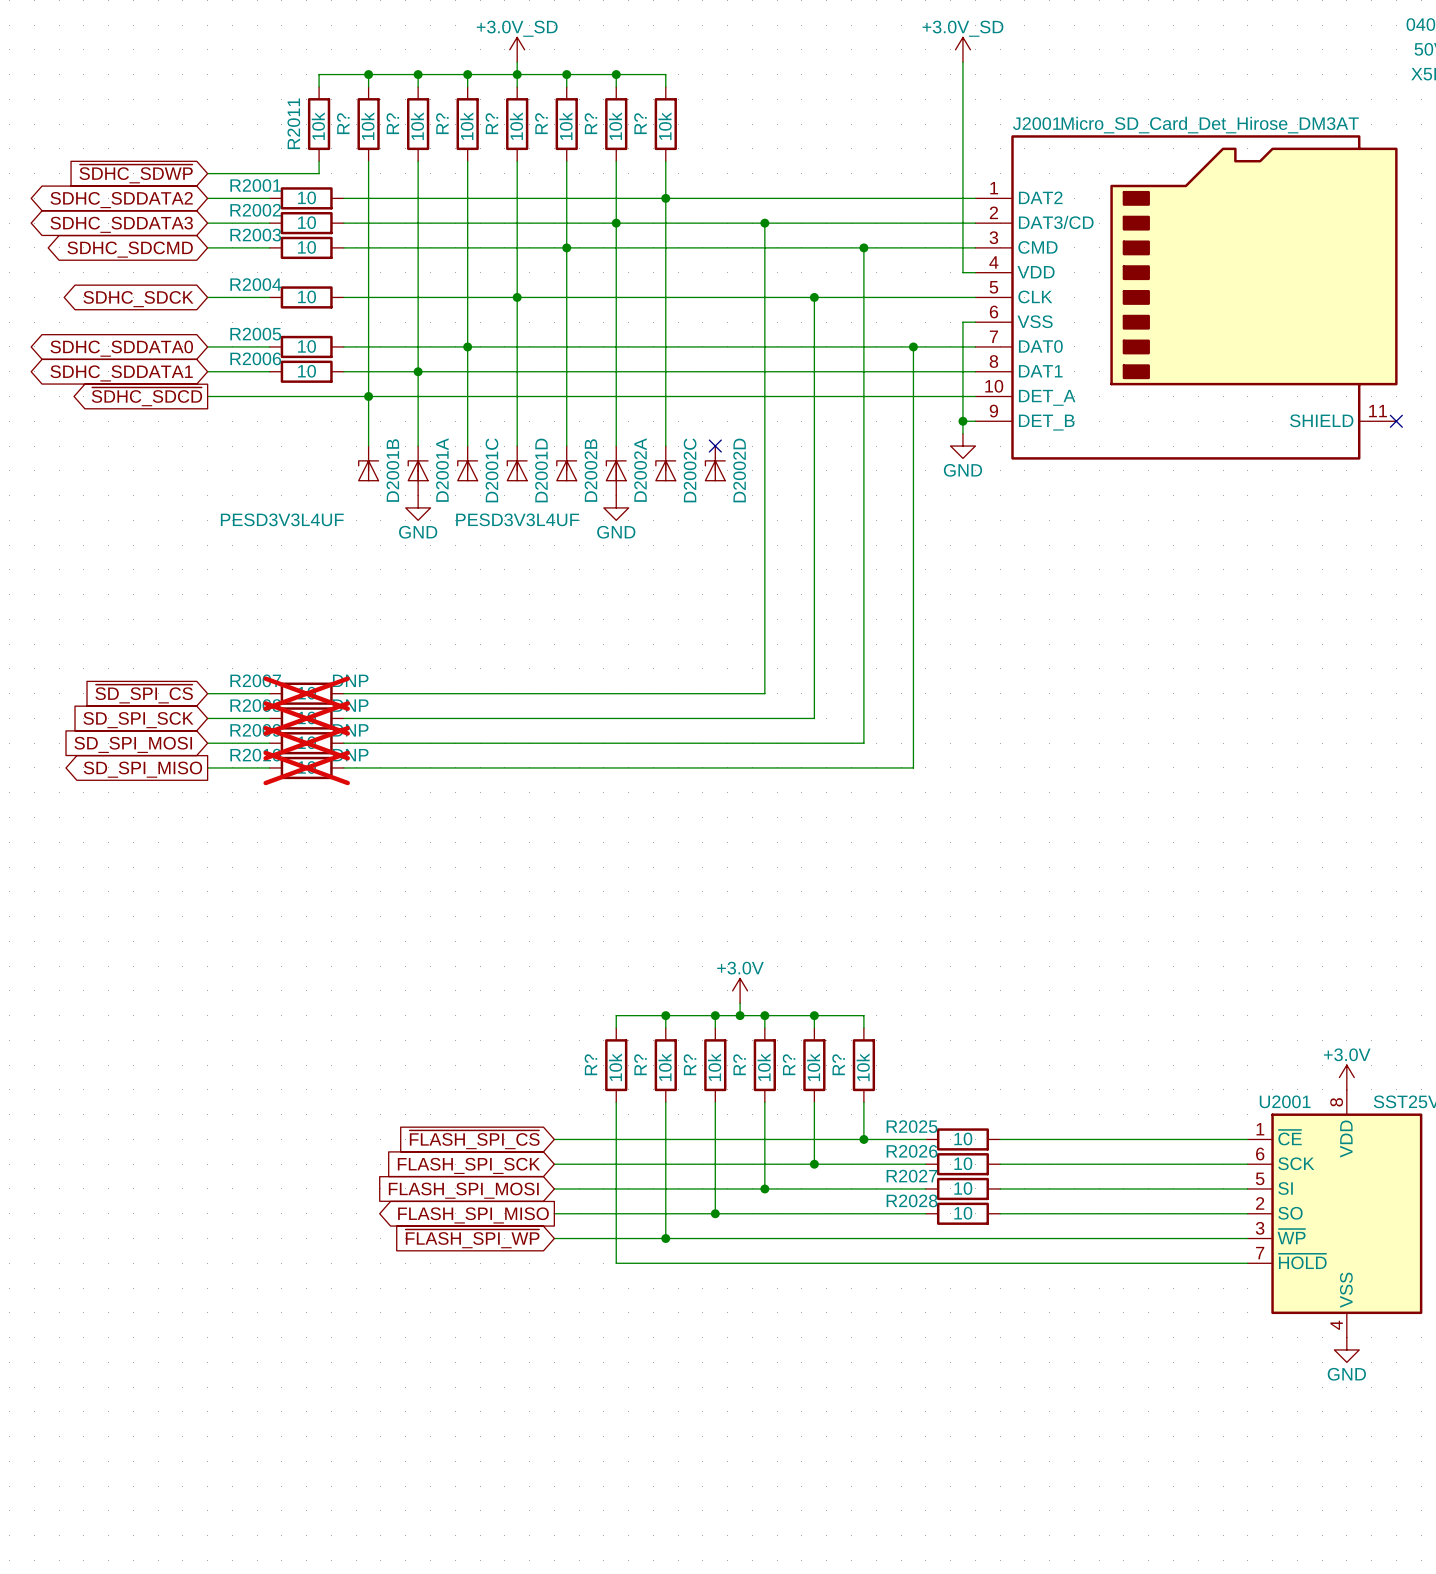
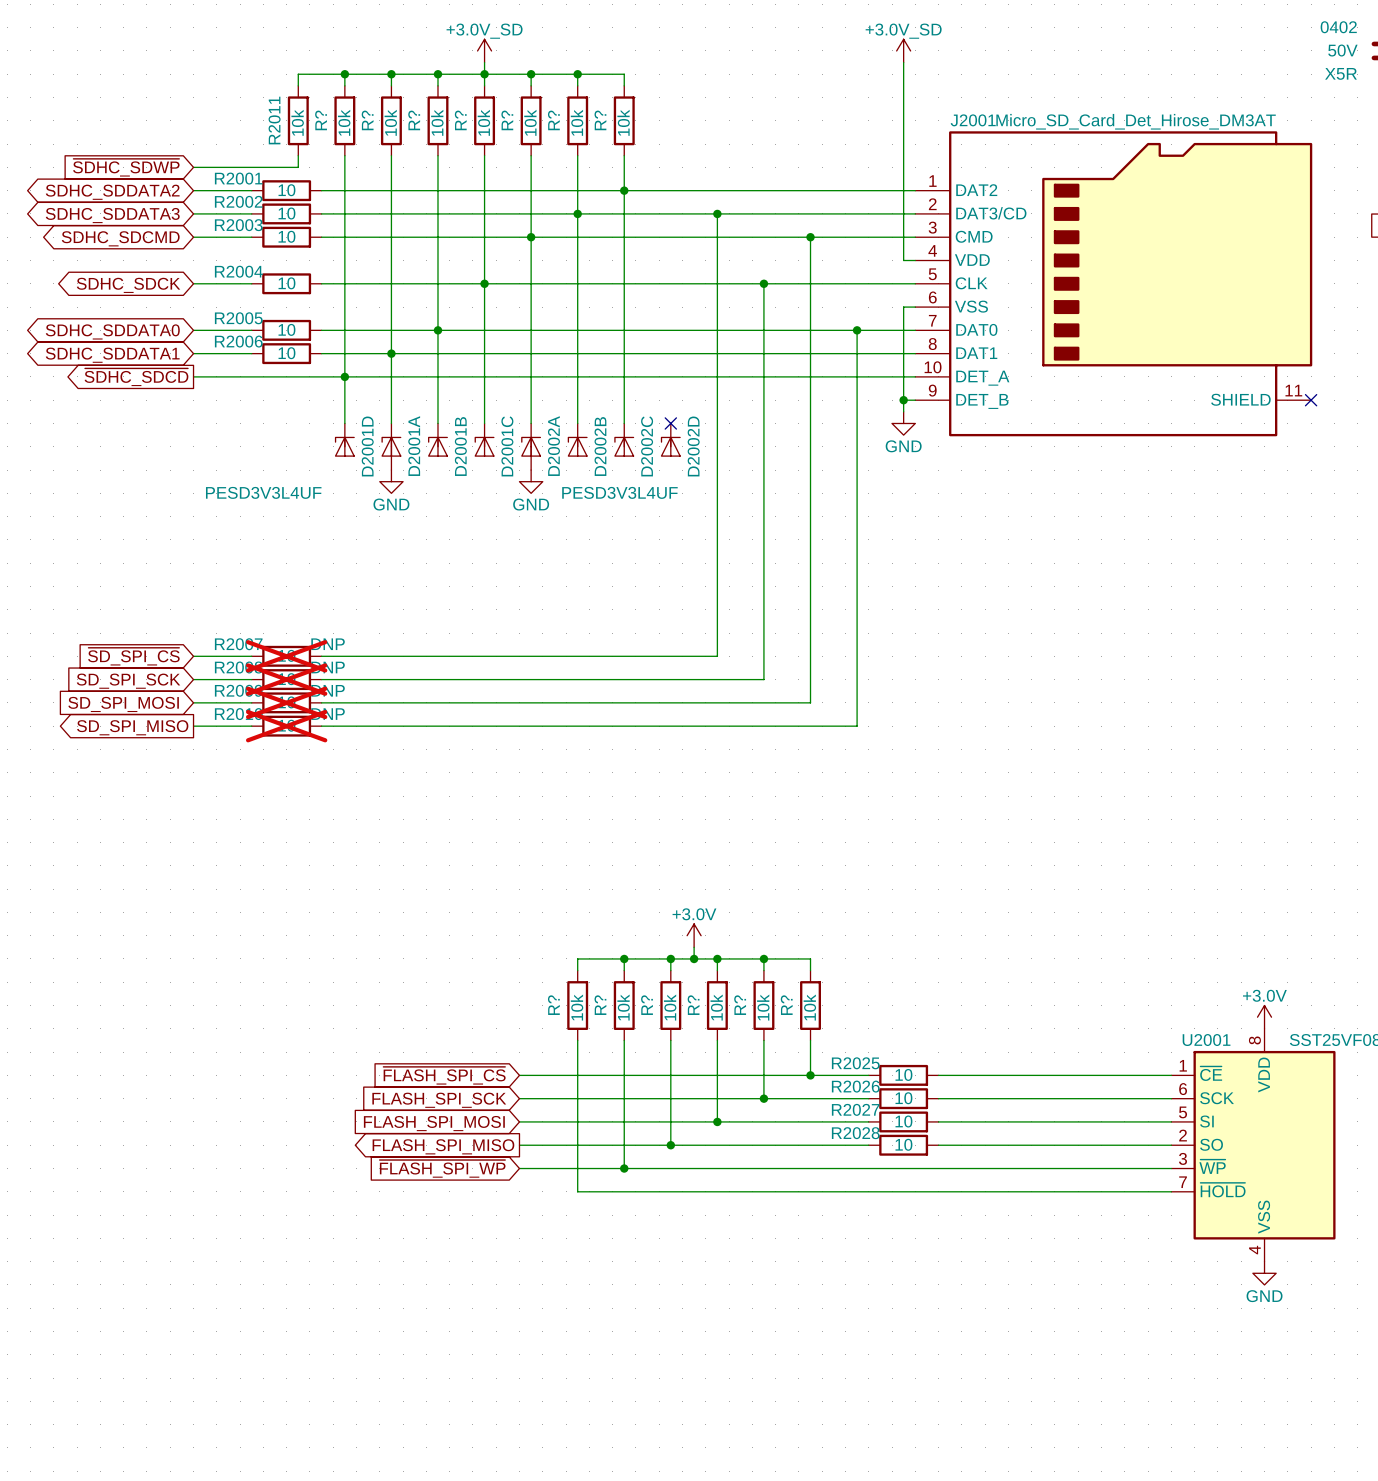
D2002B position: (566, 463) -> (577, 439)
D2001B name: D2001B (392, 470) -> D2001D (367, 446)
D2001C name: D2001C (491, 470) -> D2001B (460, 446)
D2001D name: D2001D (541, 470) -> D2001C (507, 446)
D2002A position: (616, 470) -> (531, 446)
power symbol position: GND (616, 507) -> GND (531, 481)
D2002A value position: PESD3V3L4UF (517, 519) -> PESD3V3L4UF (619, 492)

